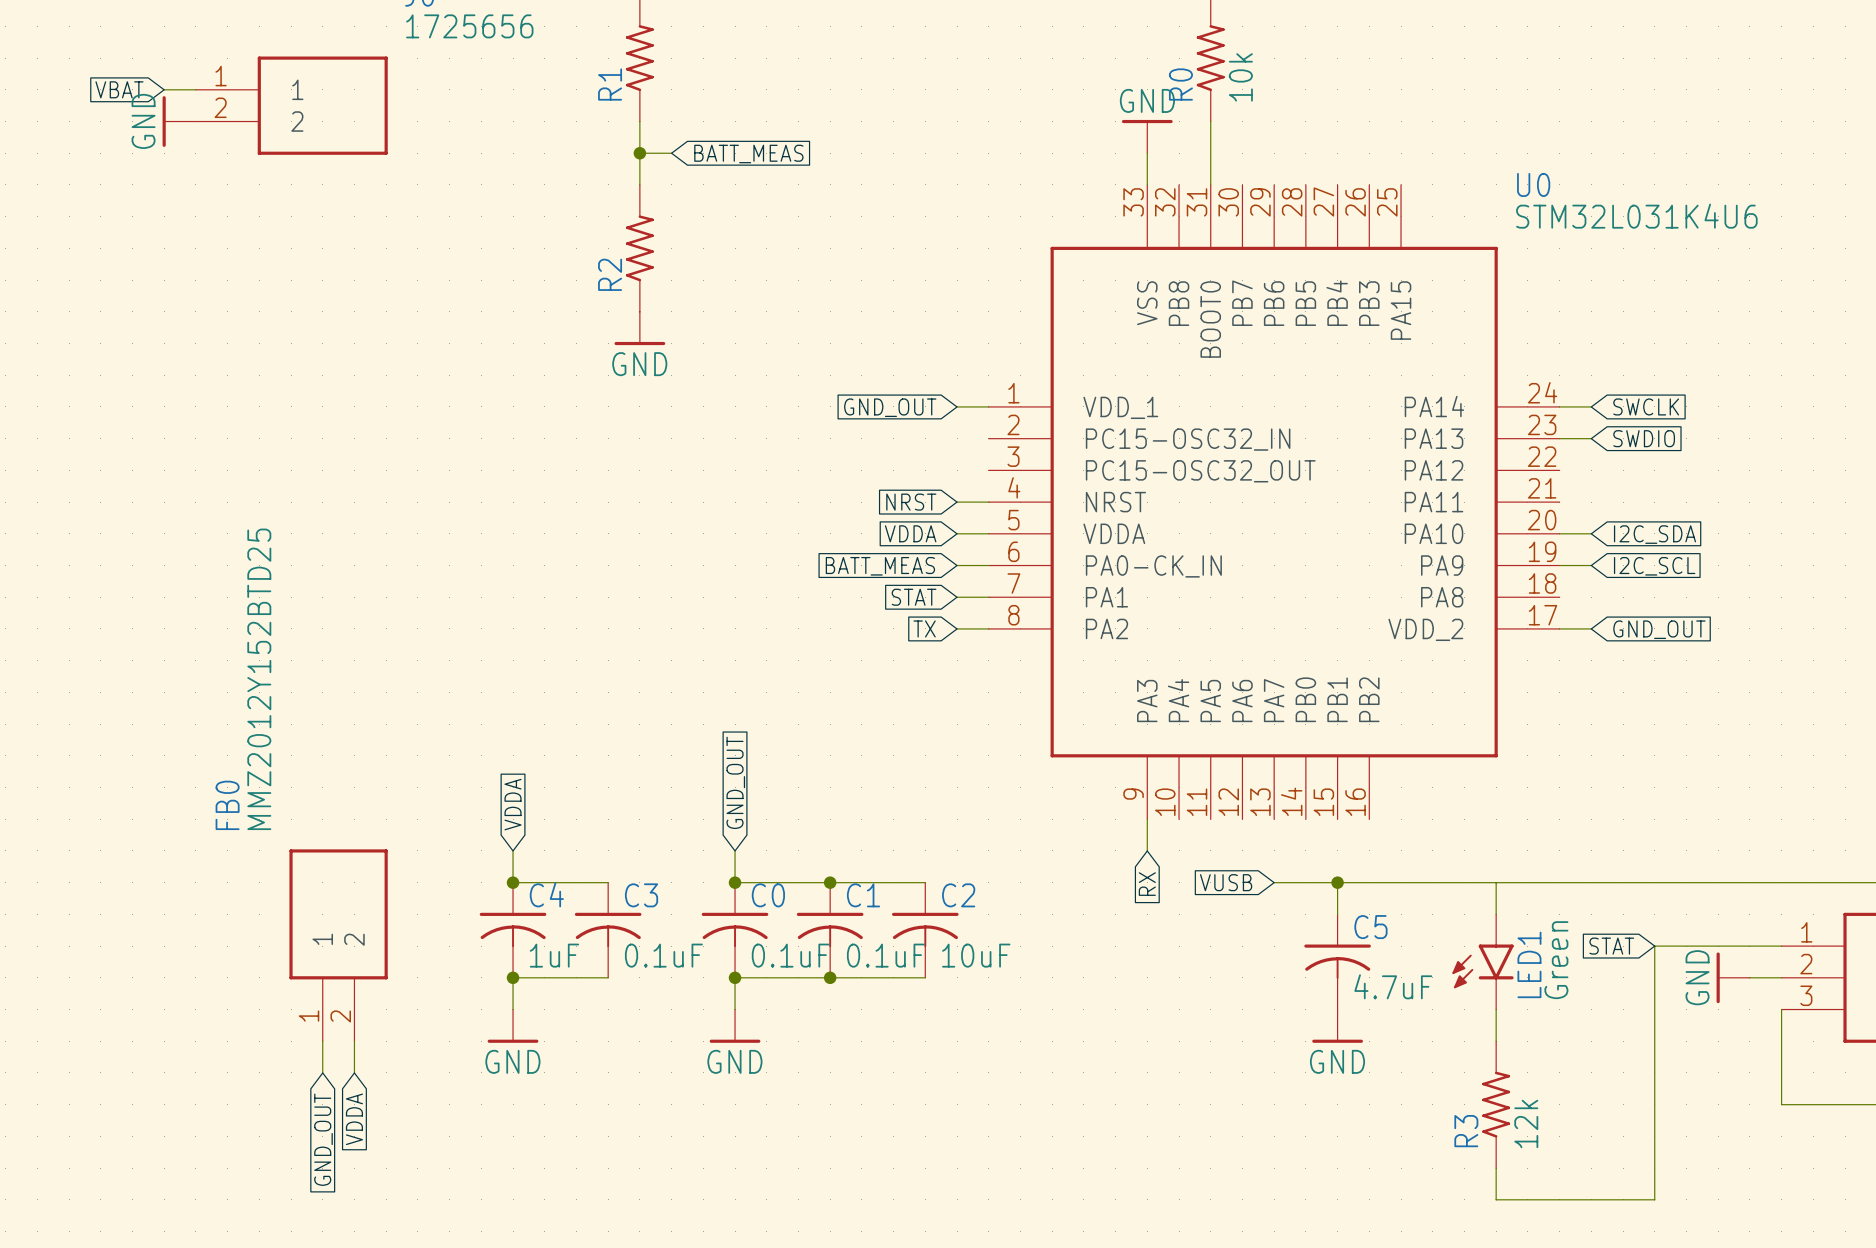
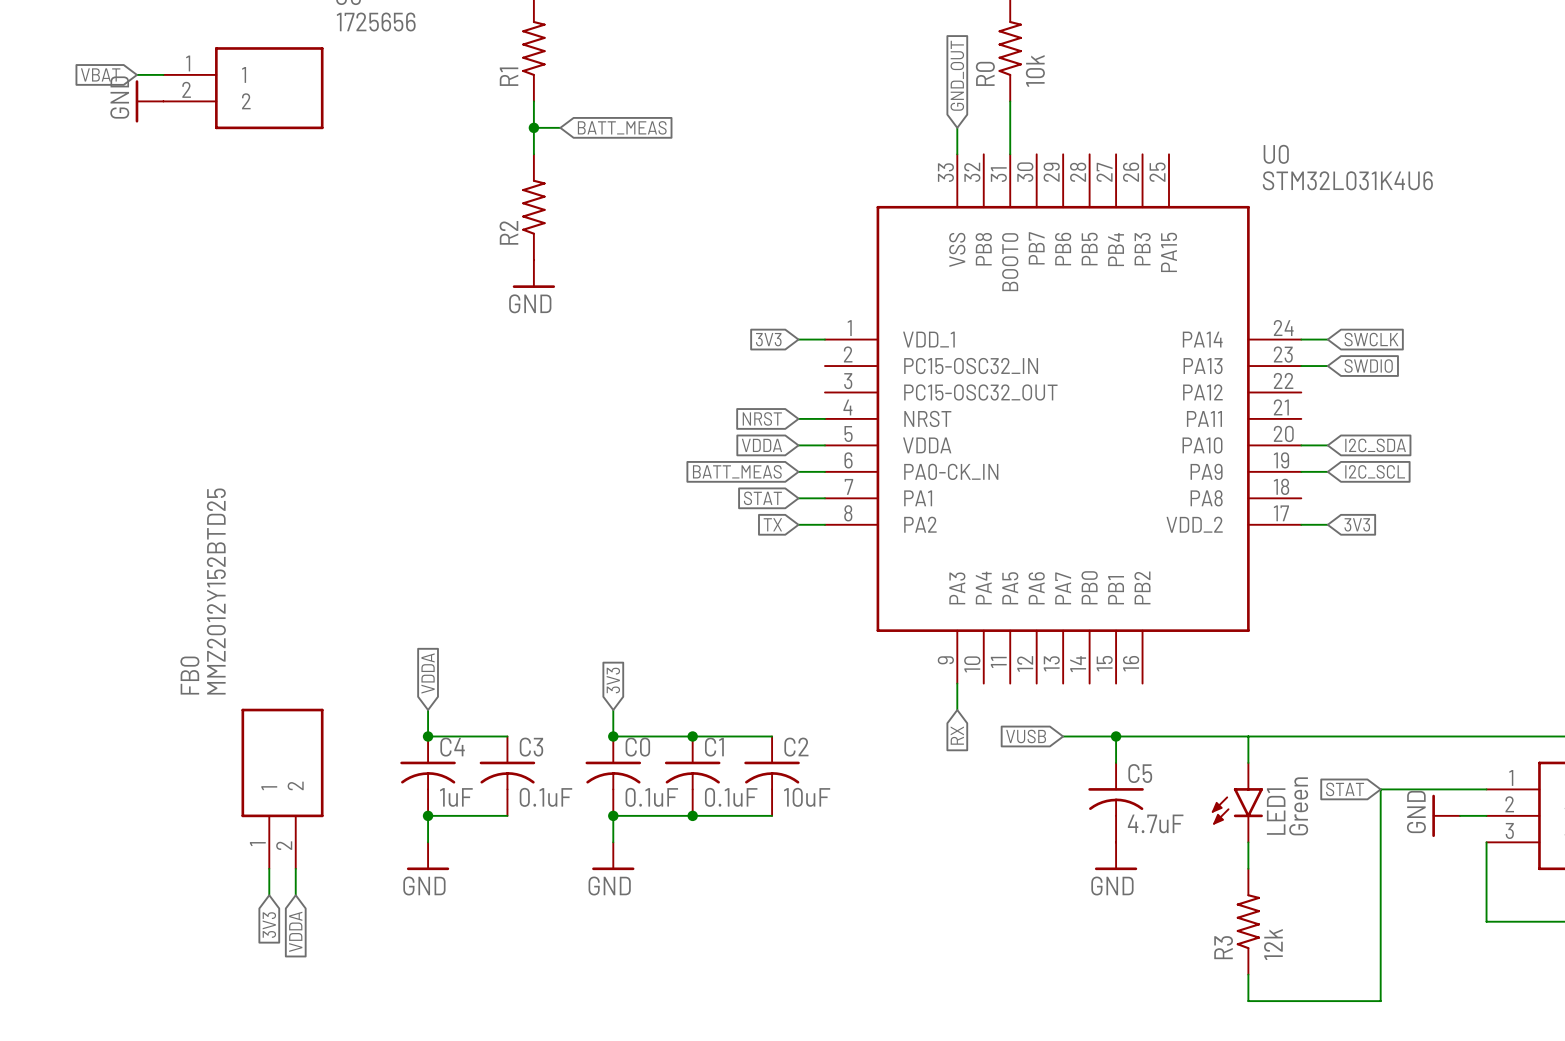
global label: none -> GND_OUT (957, 75)
power symbol: GND (1147, 136) -> none
global label: GND_OUT (890, 407) -> 3V3 (768, 339)
global label: GND_OUT (1659, 629) -> 3V3 (1357, 524)
global label: GND_OUT (735, 782) -> 3V3 (613, 680)
global label: GND_OUT (323, 1139) -> 3V3 (269, 925)

